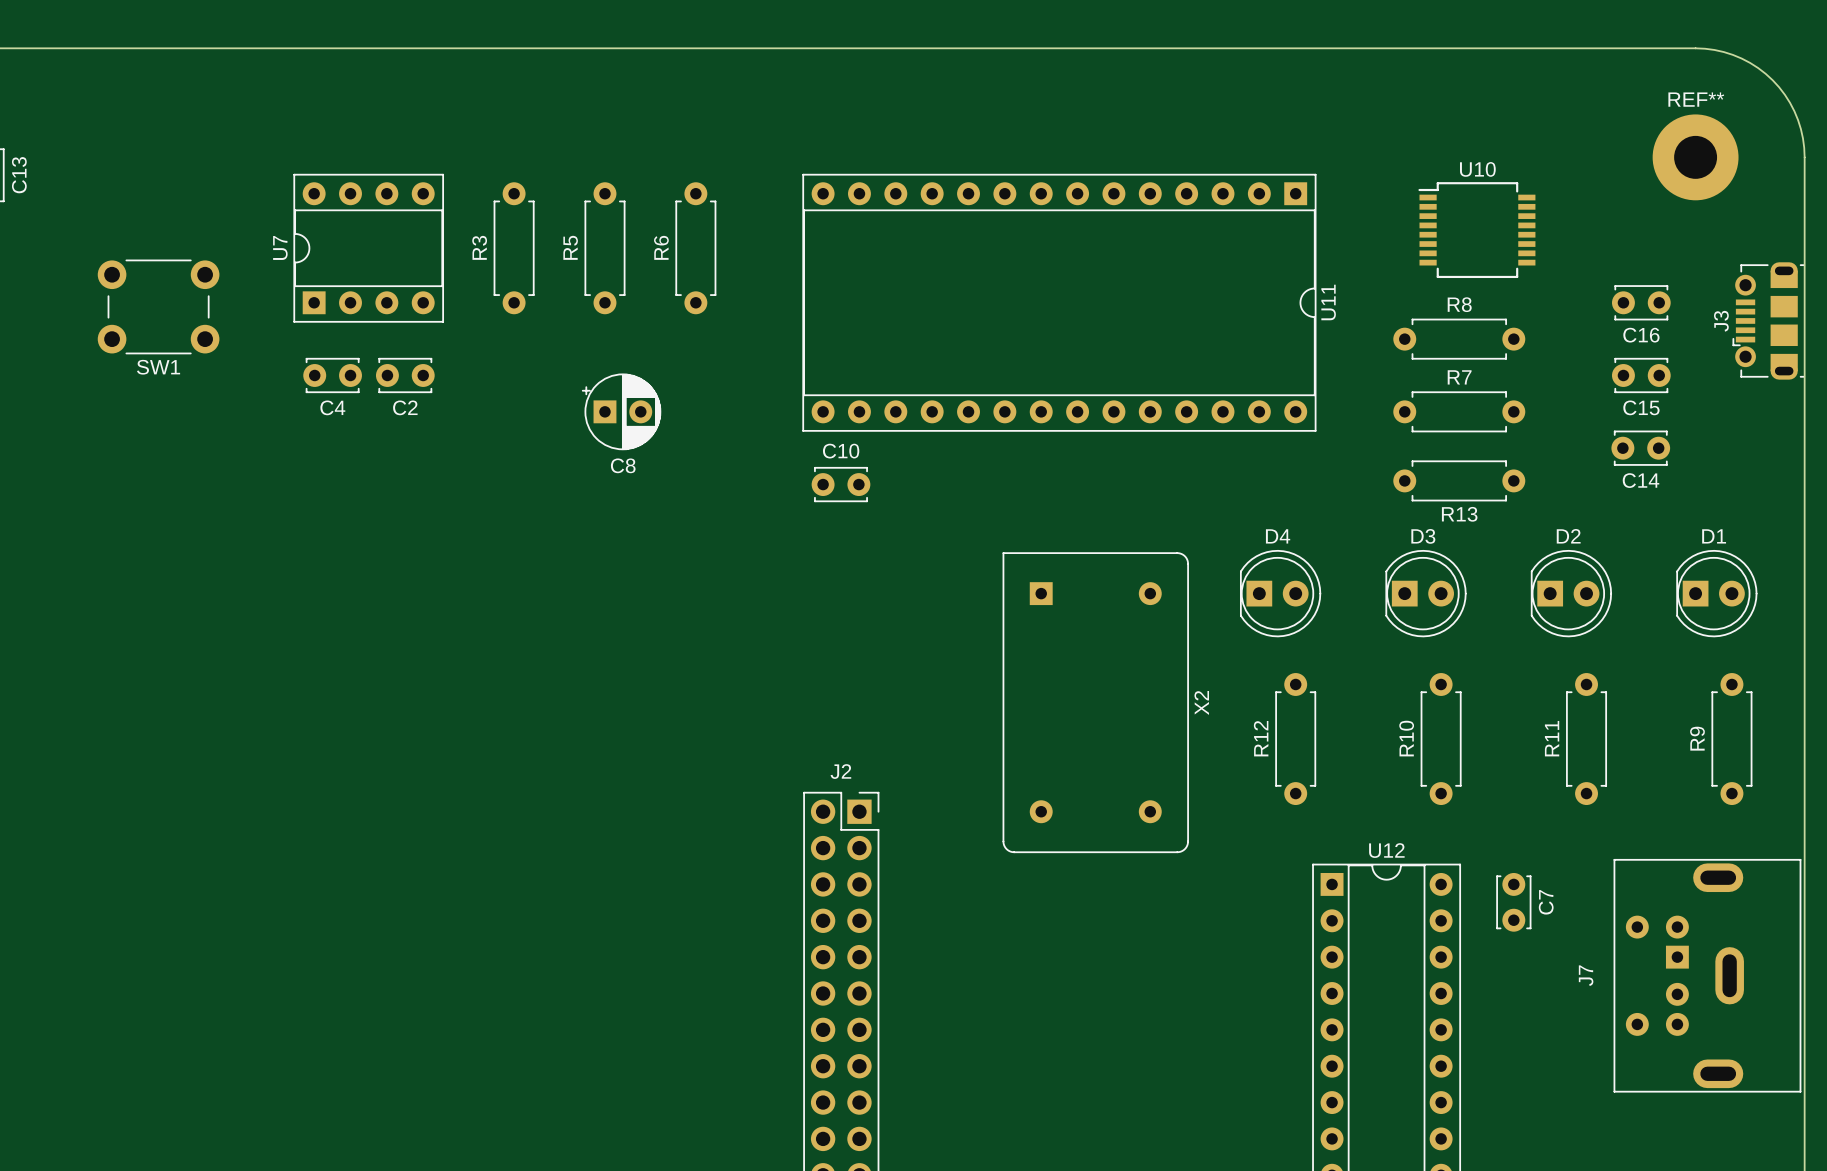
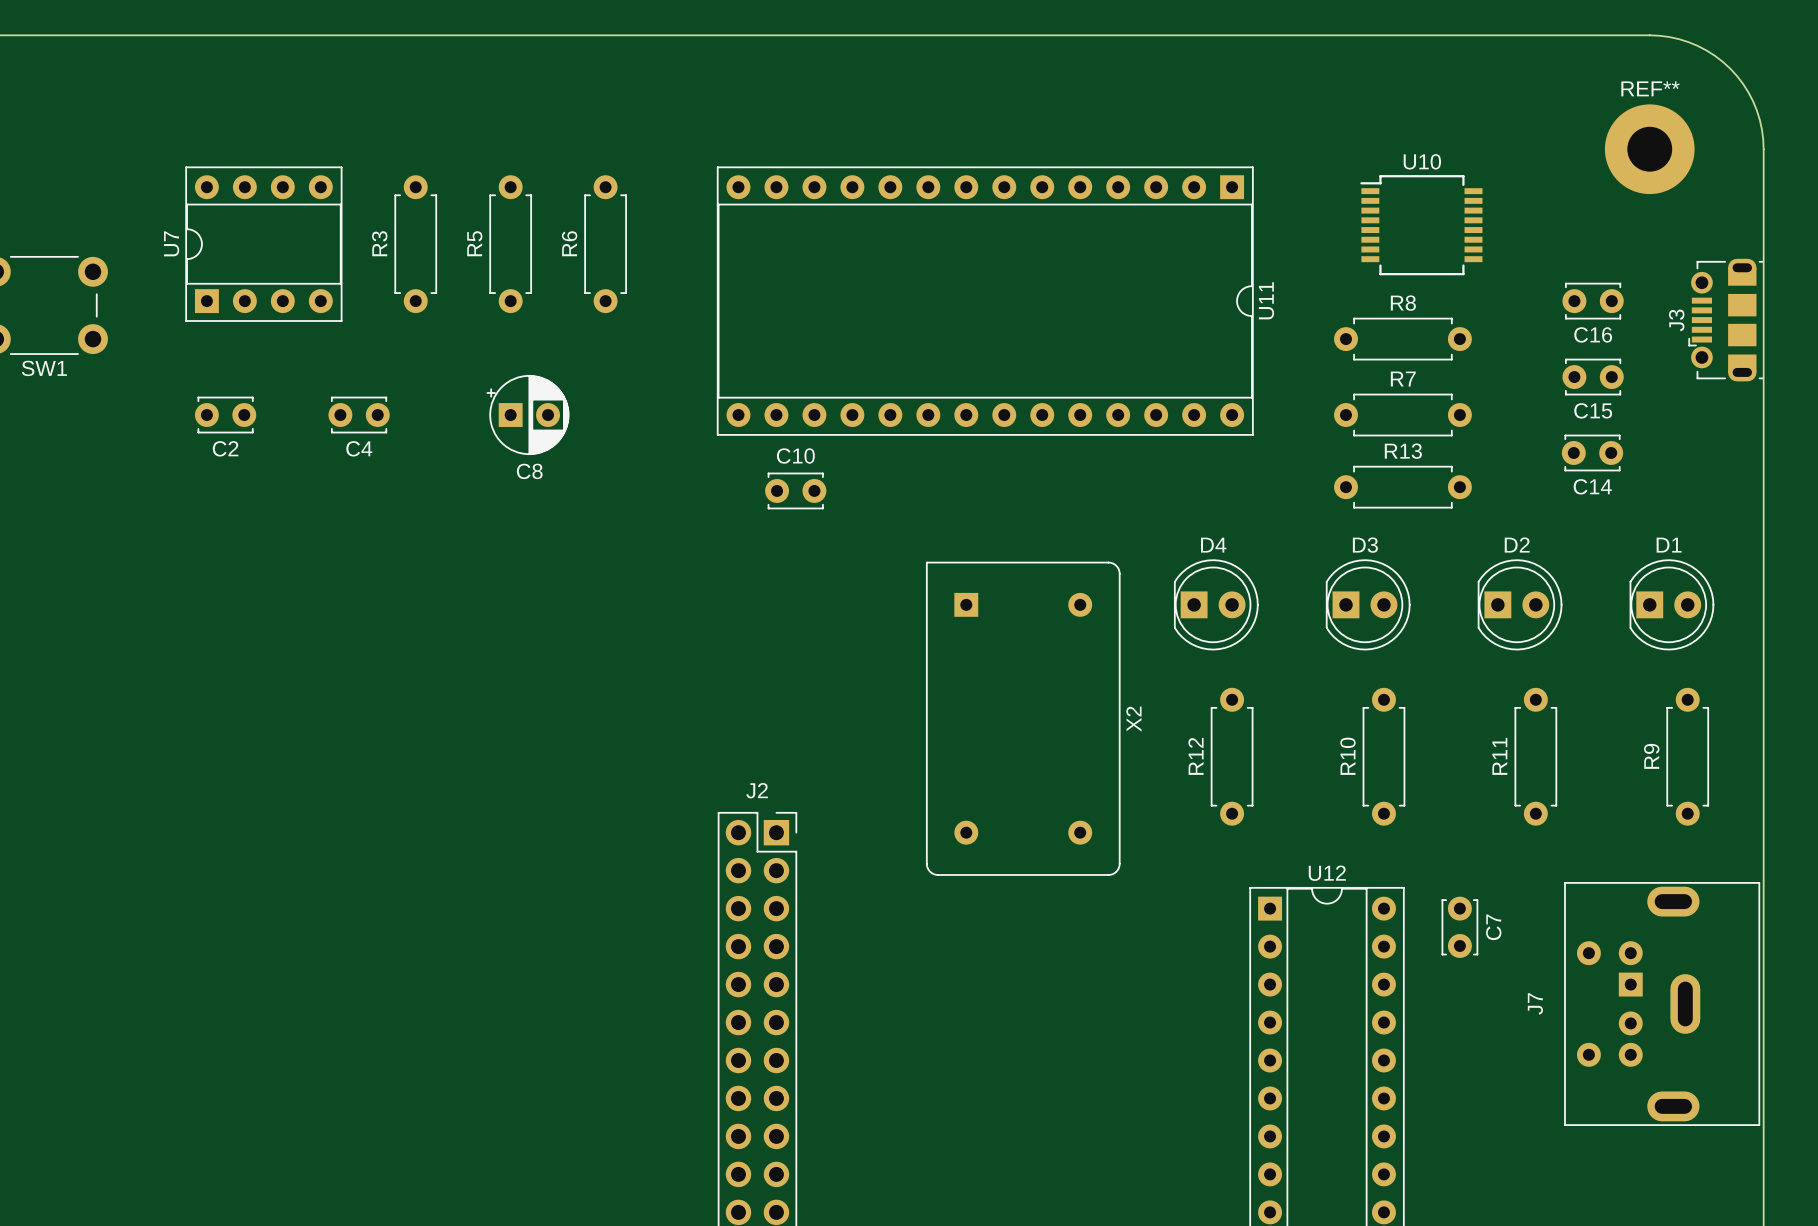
C4 position: (332, 375) -> (359, 415)
C2 position: (405, 375) -> (225, 415)
C10 position: (840, 484) -> (795, 490)
R13 name position: R13 (1459, 514) -> R13 (1403, 451)

